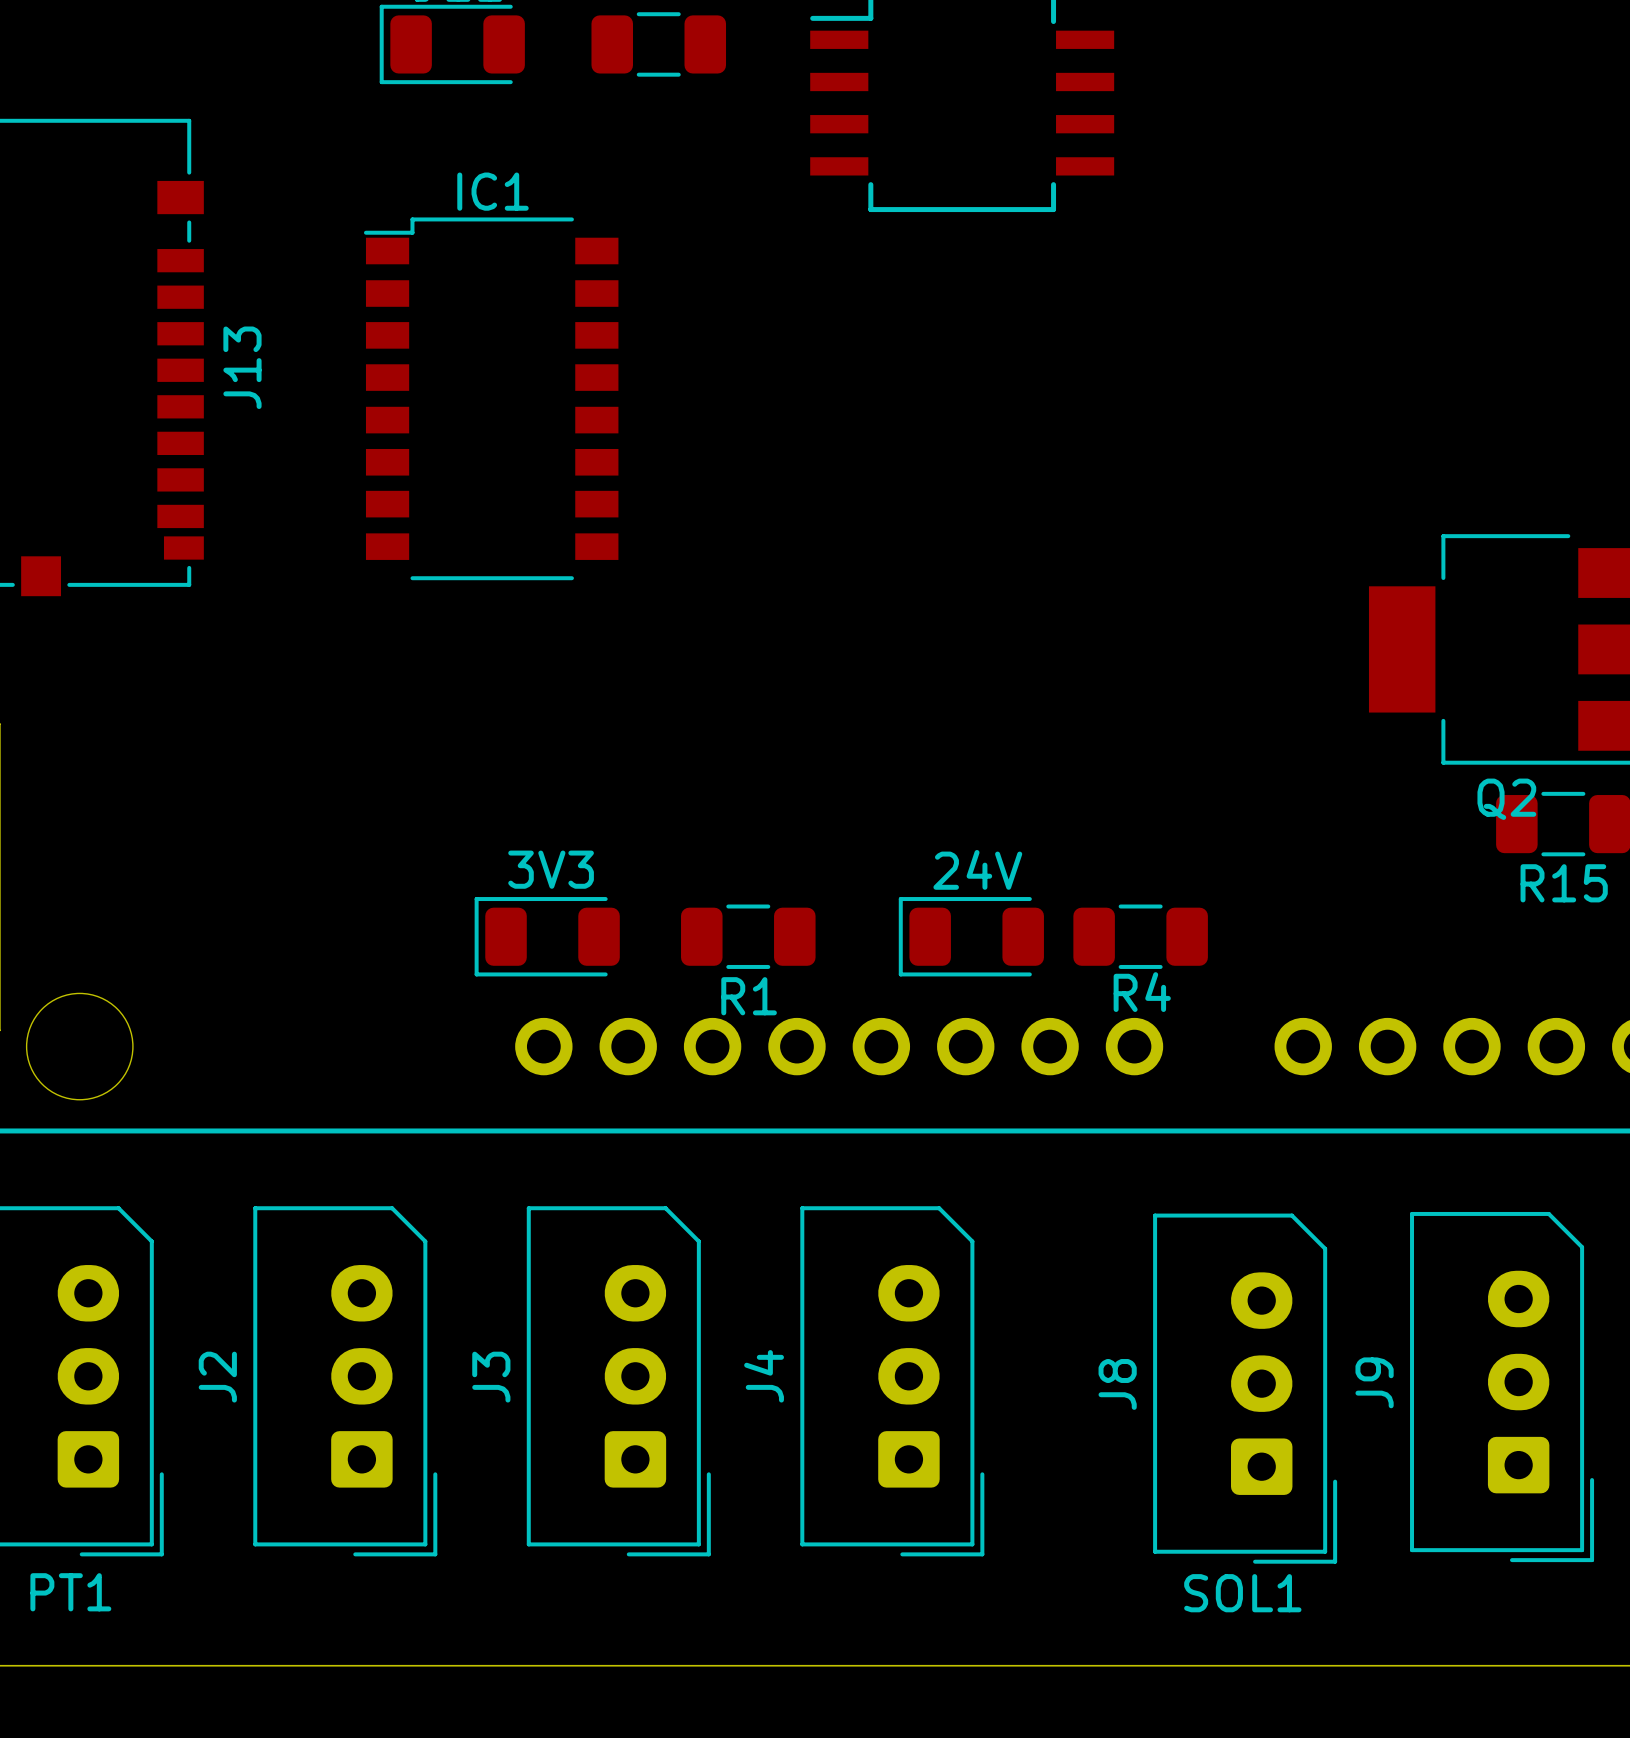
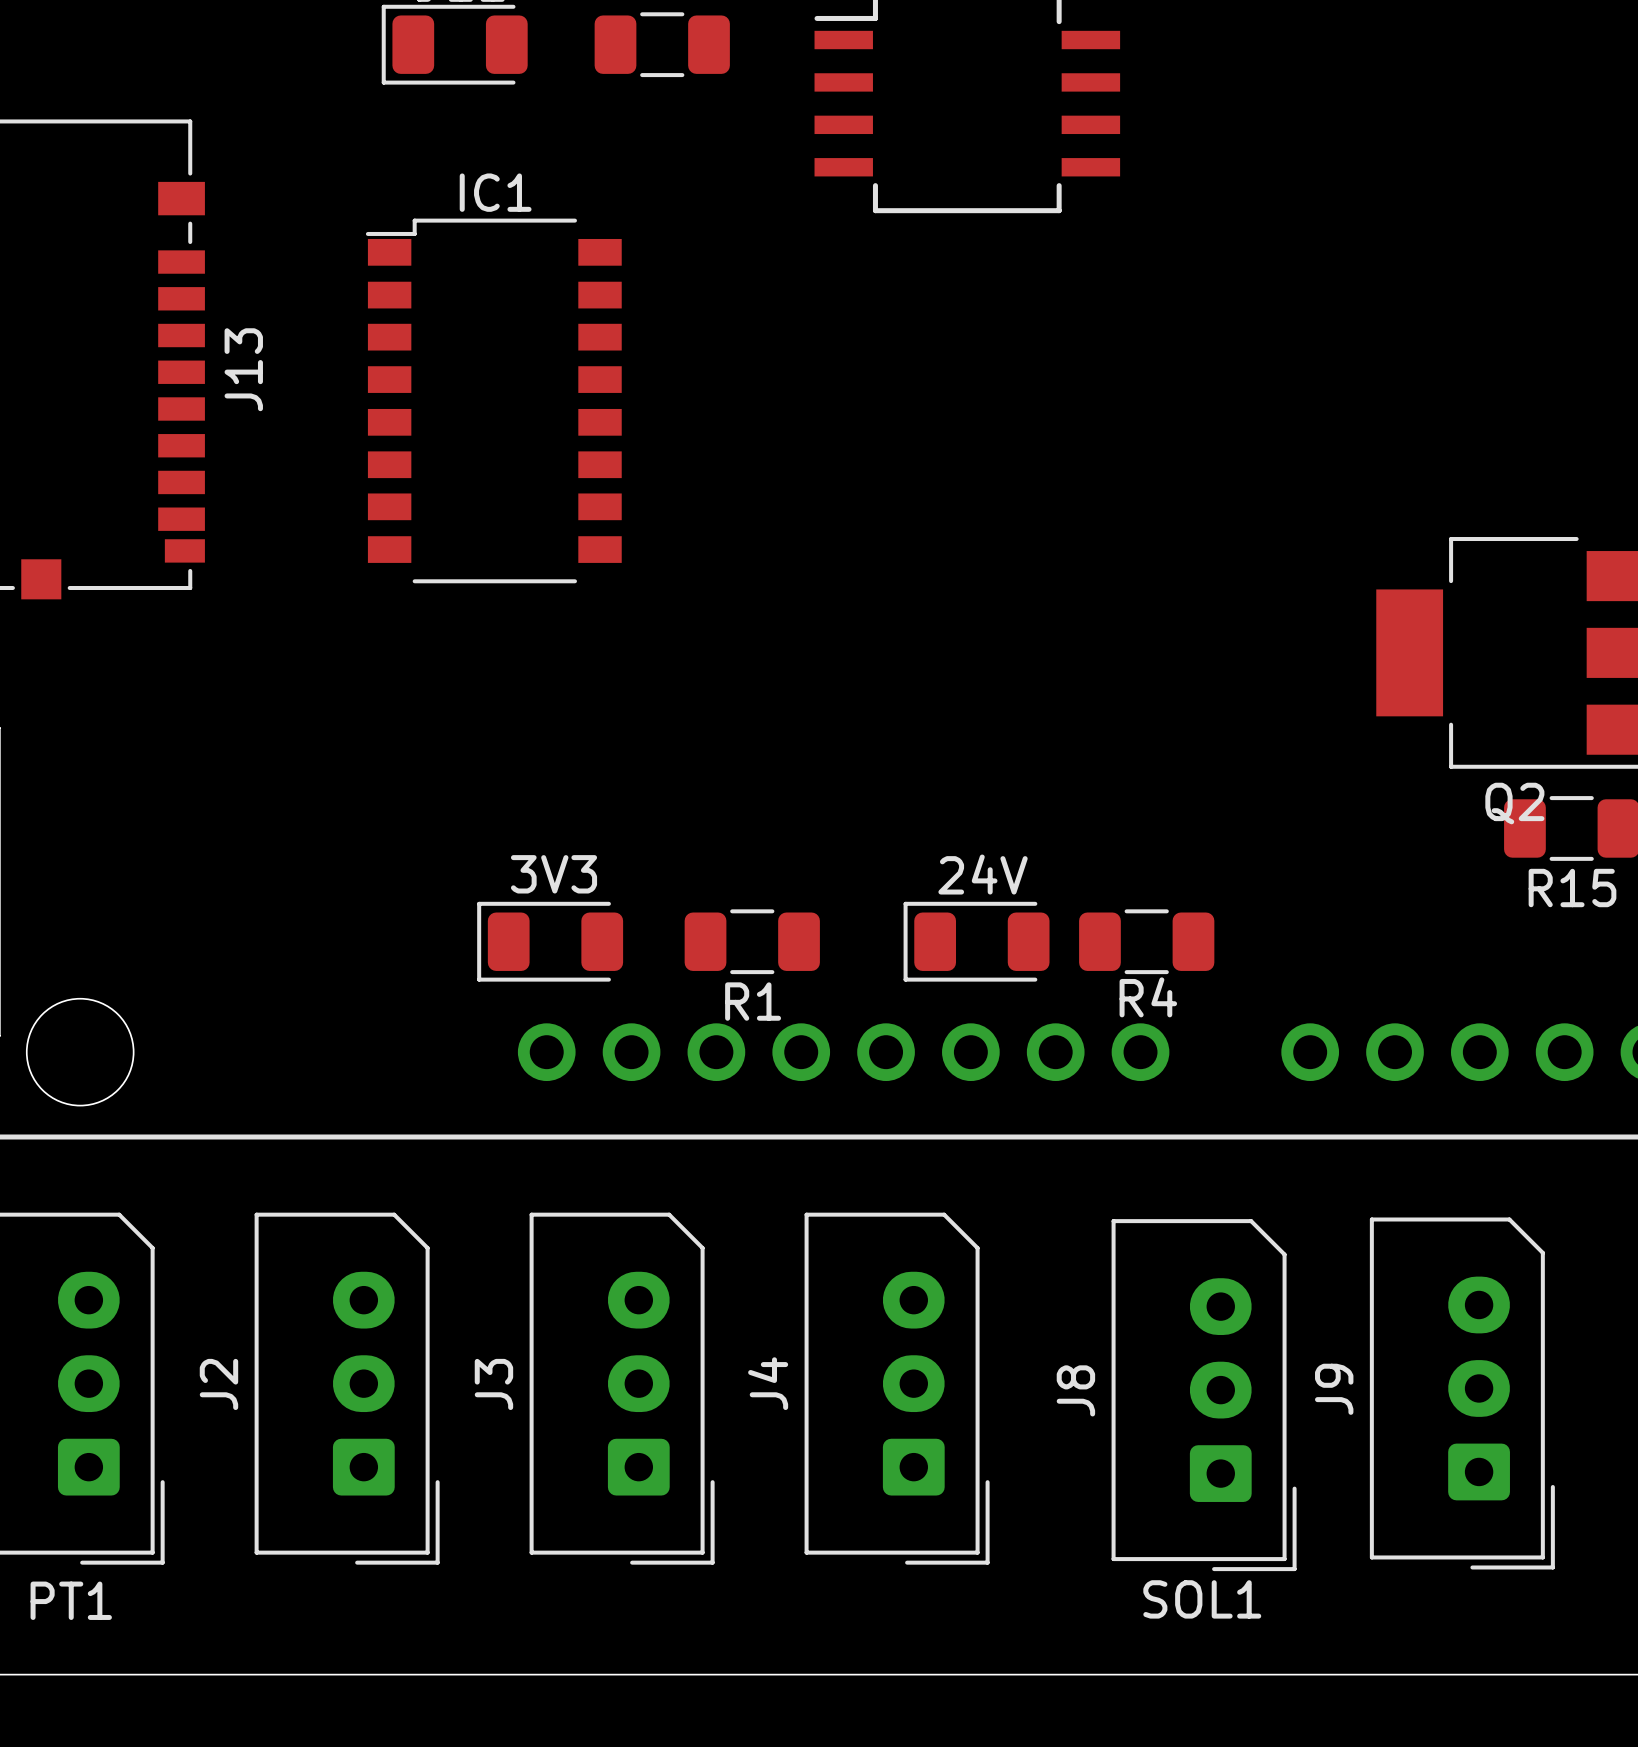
J9 position: (1502, 1387) -> (1462, 1393)
J8 position: (1245, 1388) -> (1204, 1395)
text position: SOL1 (1242, 1593) -> SOL1 (1202, 1599)

